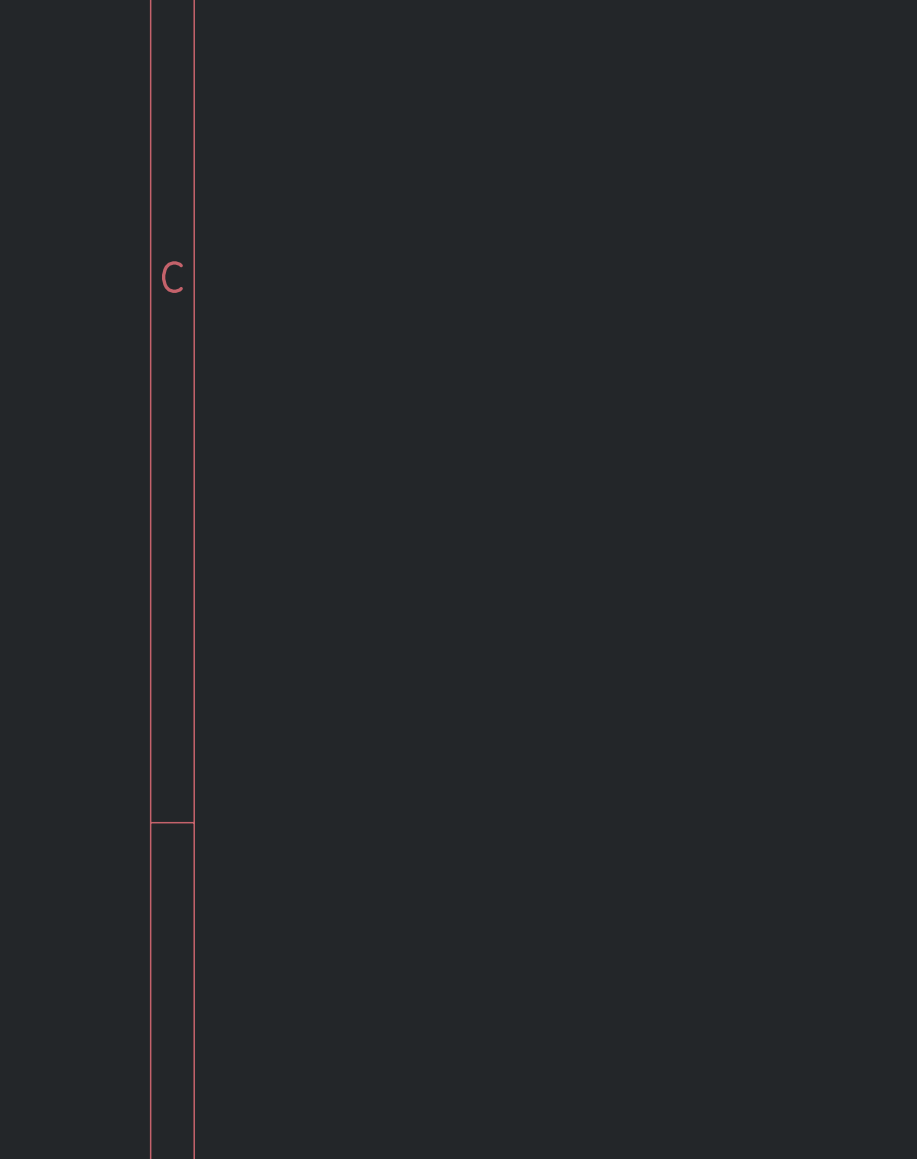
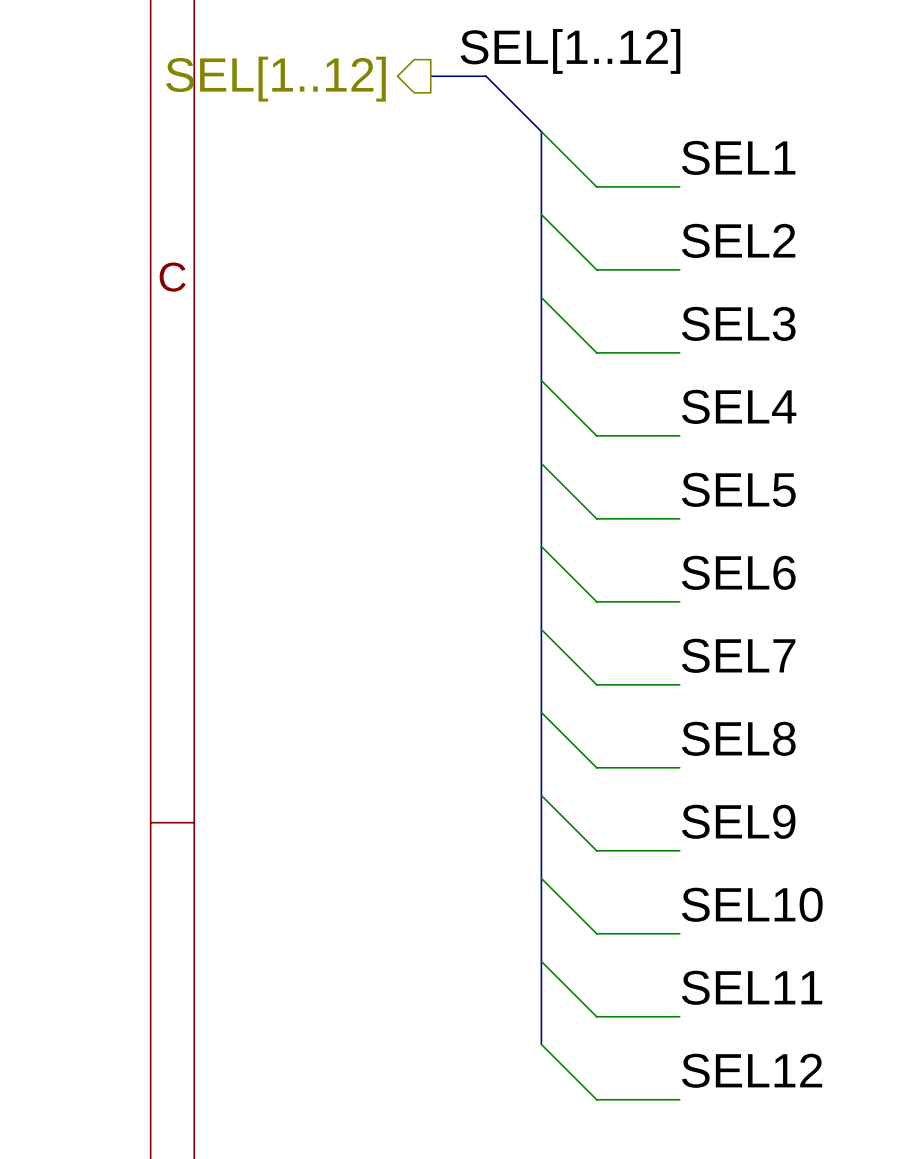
label: none -> SEL[1..12] (570, 51)
bus: none -> (430, 76) (486, 76) (541, 131) (541, 1044)
hierarchical label: none -> SEL[1..12] (275, 79)
wire: none -> (541, 131) (596, 186) (679, 186)
label: none -> SEL1 (738, 157)
wire: none -> (541, 214) (596, 269) (679, 269)
label: none -> SEL2 (738, 240)
wire: none -> (541, 297) (596, 352) (679, 352)
label: none -> SEL3 (738, 323)
wire: none -> (541, 380) (596, 435) (679, 435)
label: none -> SEL4 (739, 406)
wire: none -> (541, 463) (596, 518) (679, 518)
label: none -> SEL5 (738, 489)
wire: none -> (541, 546) (596, 601) (679, 601)
label: none -> SEL6 (738, 572)
wire: none -> (541, 629) (596, 684) (679, 684)
label: none -> SEL7 (738, 655)
wire: none -> (541, 712) (596, 767) (679, 767)
label: none -> SEL8 (738, 738)
wire: none -> (541, 795) (596, 850) (679, 850)
label: none -> SEL9 (738, 821)
wire: none -> (541, 878) (596, 933) (679, 933)
label: none -> SEL10 (752, 904)
wire: none -> (541, 961) (596, 1016) (679, 1016)
label: none -> SEL11 (752, 987)
wire: none -> (541, 1044) (596, 1099) (679, 1099)
label: none -> SEL12 (752, 1070)

